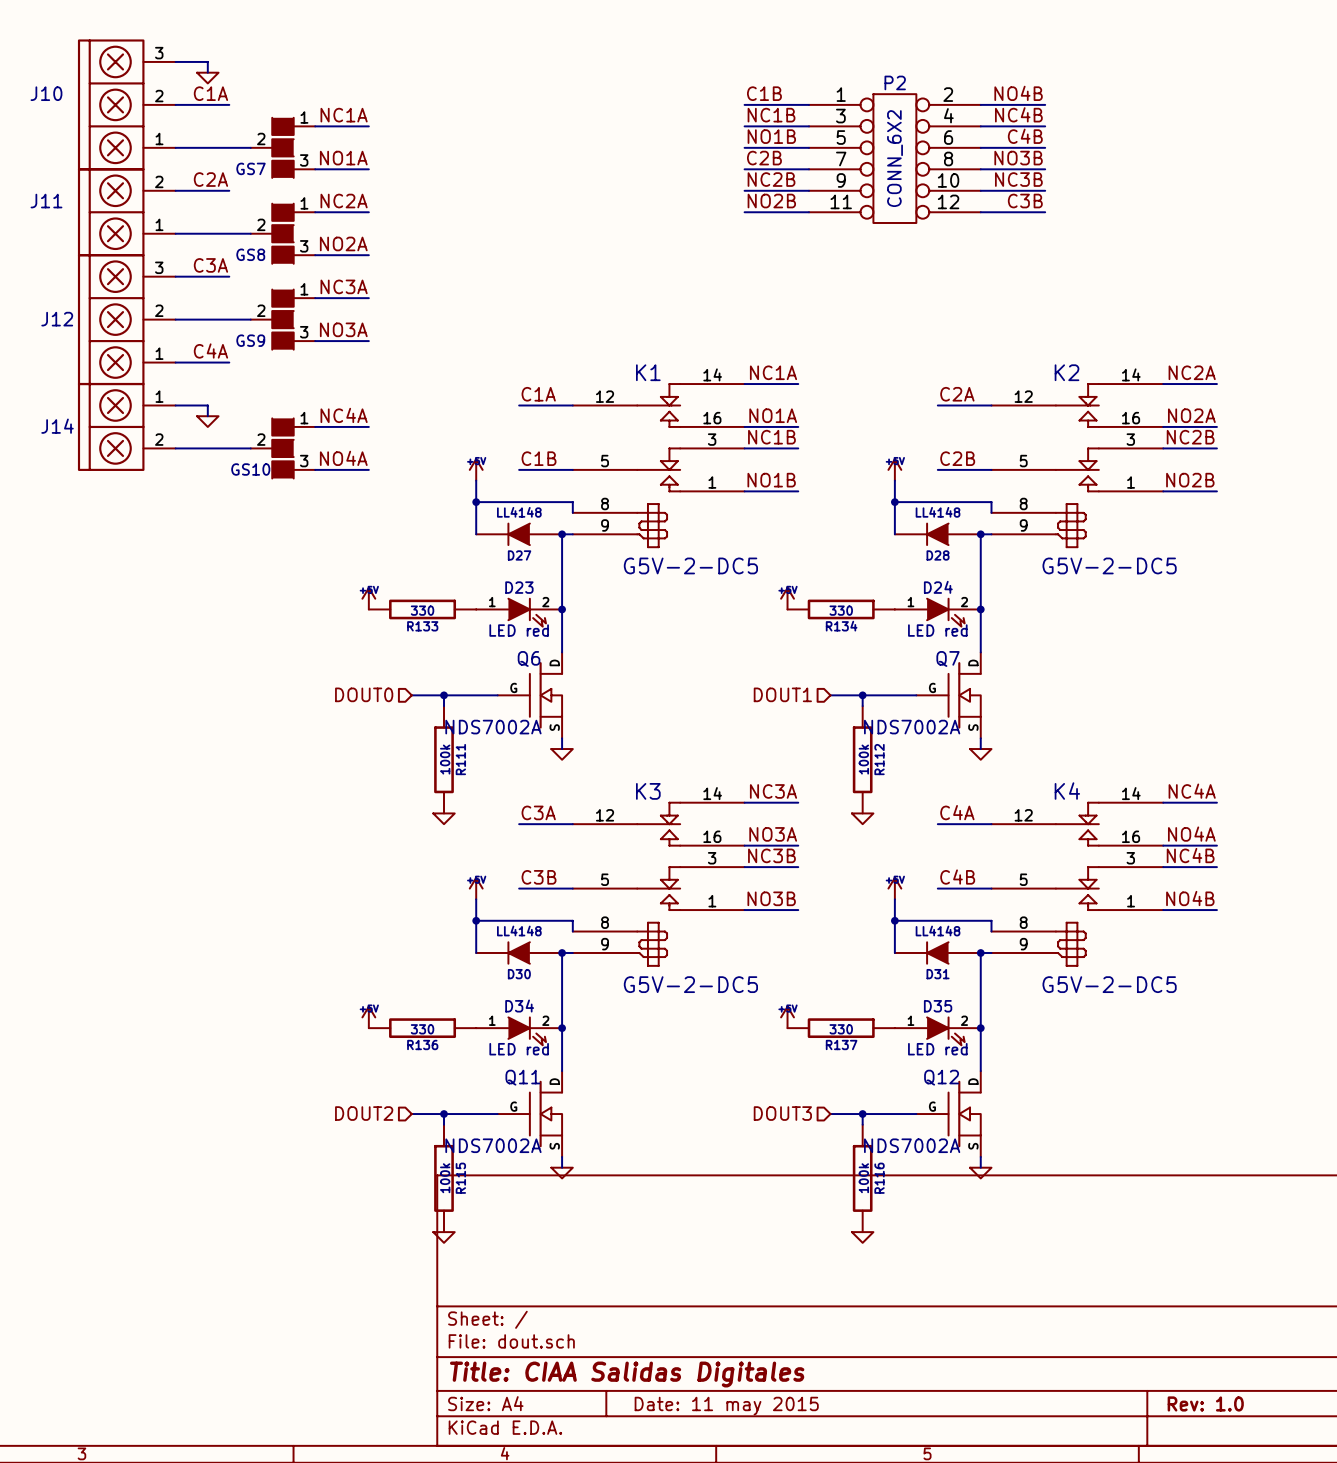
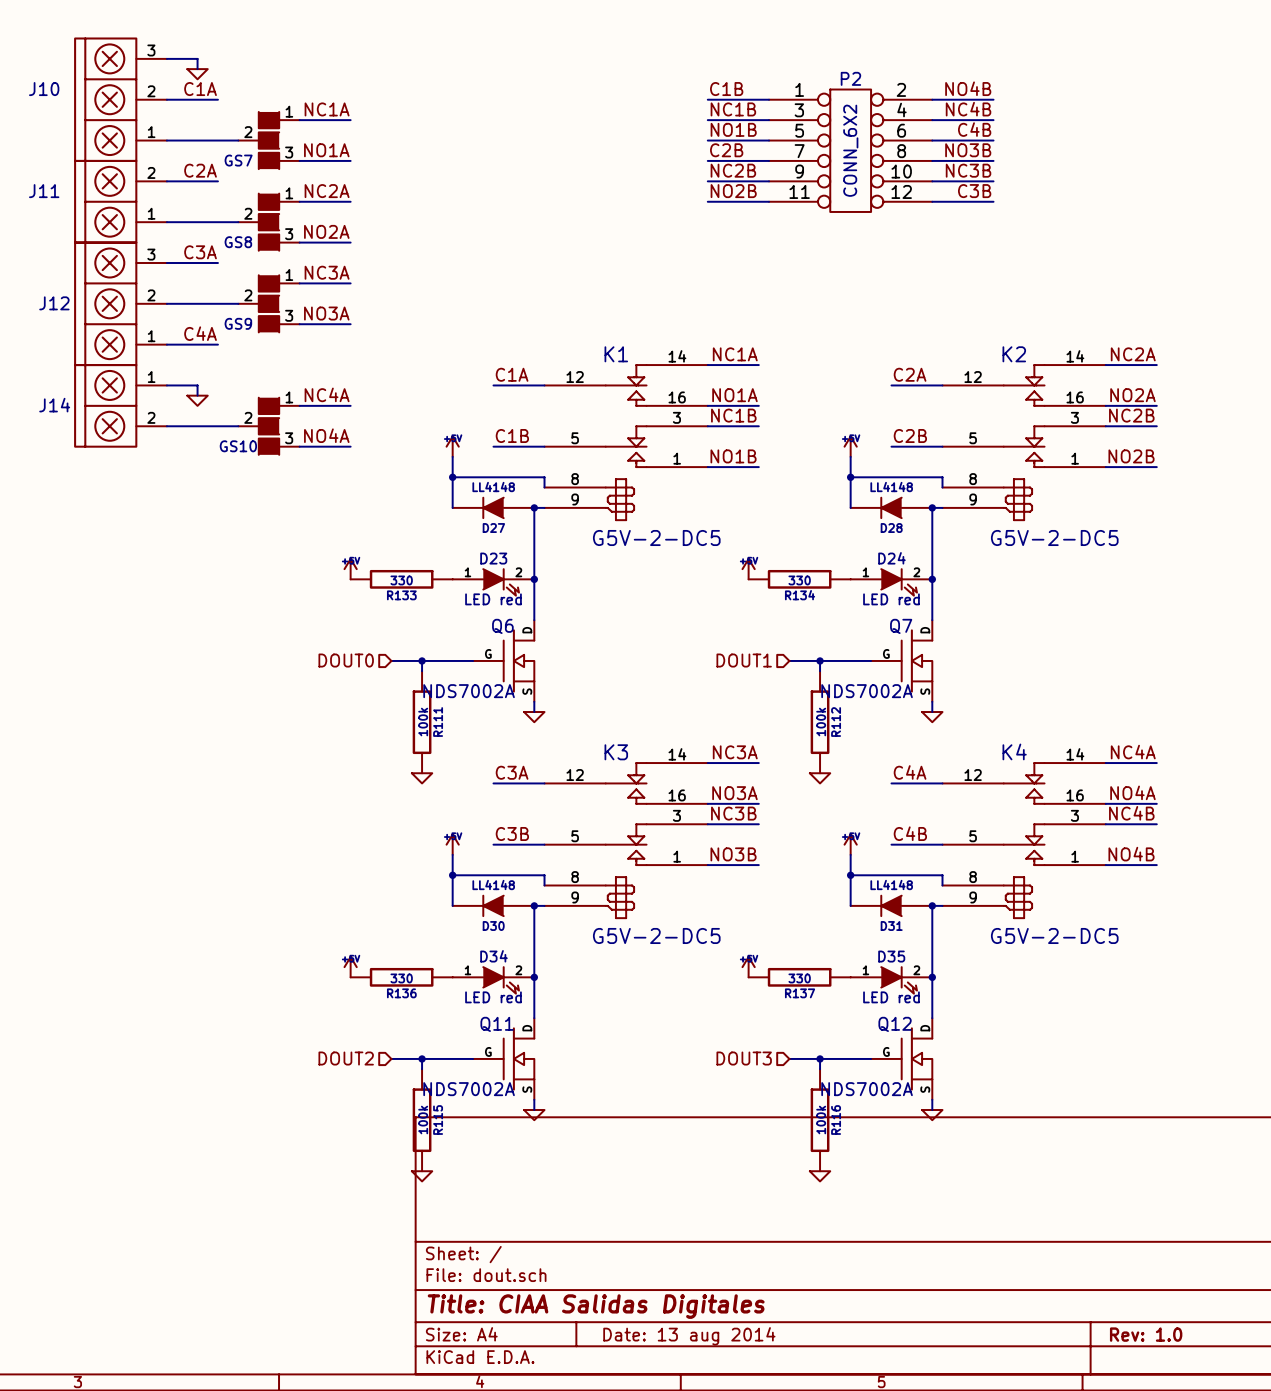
title block: Date: 11 may 2015 (726, 1406) -> Date: 13 aug 2014 (689, 1336)

